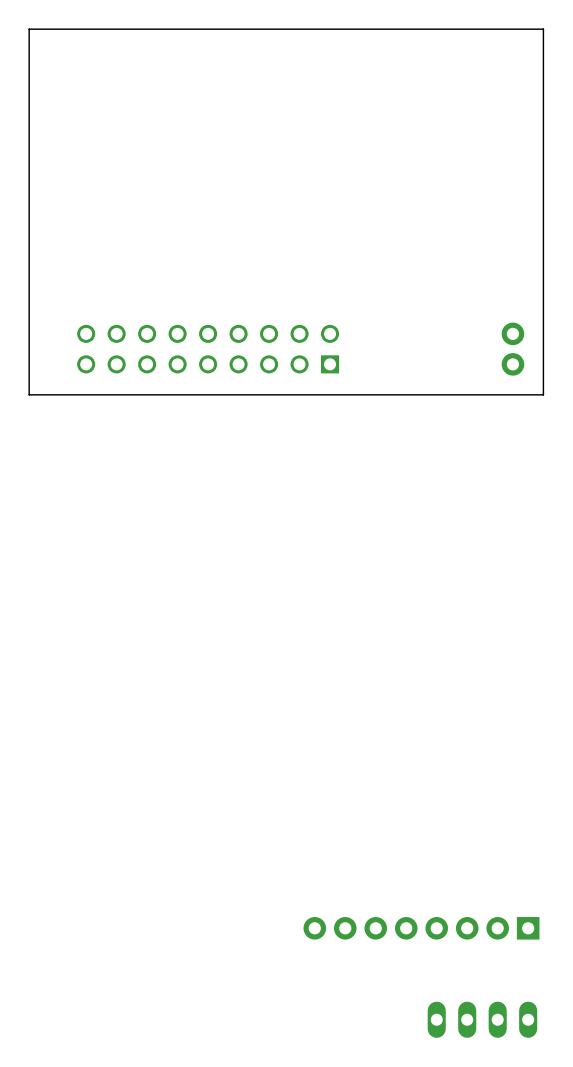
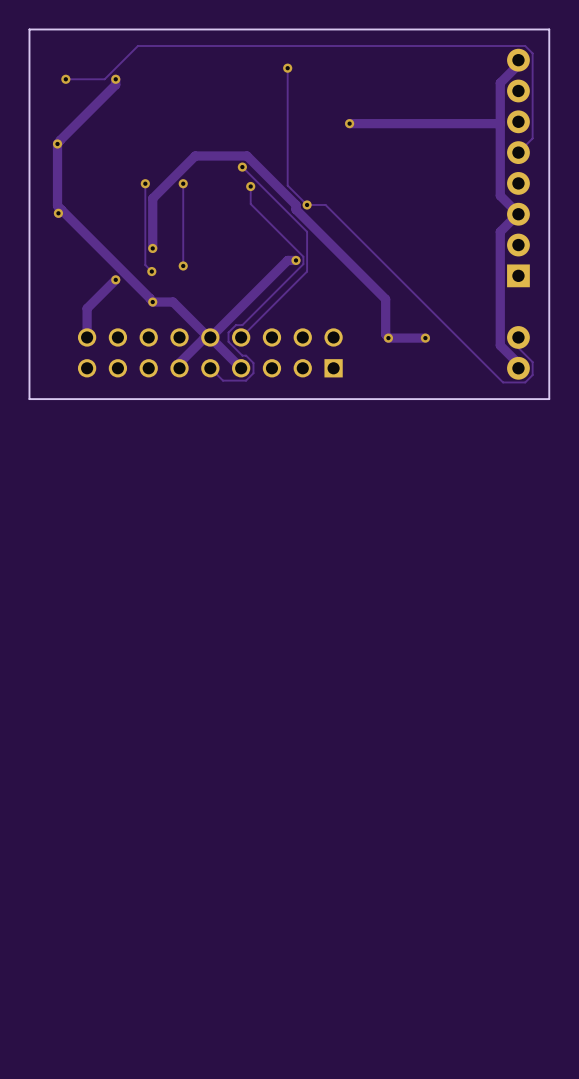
track: none -> (518, 60) (517, 65) (500, 82) (500, 195) (518, 214) (500, 231) (500, 345) (517, 363) (518, 368)
track: none -> (287, 68) (287, 185) (307, 204) (325, 204) (503, 382) (525, 382) (532, 375) (532, 362) (518, 348) (518, 337)
via: none -> (287, 68)
track: none -> (65, 79) (104, 79) (137, 46) (525, 46) (532, 53) (532, 138) (518, 152)
via: none -> (65, 79)
track: none -> (115, 79) (115, 84) (57, 143) (57, 205) (152, 302) (173, 302) (210, 337)
via: none -> (115, 79)
via: none -> (349, 123)
track: none -> (500, 123) (349, 123)
via: none -> (57, 143)
track: none -> (242, 167) (307, 231) (307, 271) (241, 337)
via: none -> (242, 167)
part: none -> (518, 168)
track: none -> (145, 183) (145, 265) (151, 271)
via: none -> (145, 183)
track: none -> (183, 183) (183, 265)
via: none -> (183, 183)
track: none -> (250, 186) (250, 204) (303, 256) (303, 264) (242, 325) (235, 325) (228, 332) (228, 341) (242, 355) (246, 355) (253, 363) (253, 373) (246, 380) (222, 380) (210, 368)
via: none -> (250, 186)
via: none -> (307, 204)
via: none -> (58, 213)
track: none -> (152, 248) (152, 198) (195, 155) (247, 155) (296, 204) (296, 209) (385, 299) (385, 334) (388, 338) (425, 338)
via: none -> (152, 248)
track: none -> (296, 260) (287, 260) (210, 337)
via: none -> (296, 260)
via: none -> (183, 265)
via: none -> (151, 271)
track: none -> (115, 279) (87, 308) (87, 337)
via: none -> (115, 279)
via: none -> (152, 302)
track: none -> (210, 337) (241, 368)
track: none -> (210, 337) (203, 339) (179, 363) (179, 368)
via: none -> (388, 338)
via: none -> (425, 338)
part: (421, 928) -> none
part: (482, 1019) -> none

